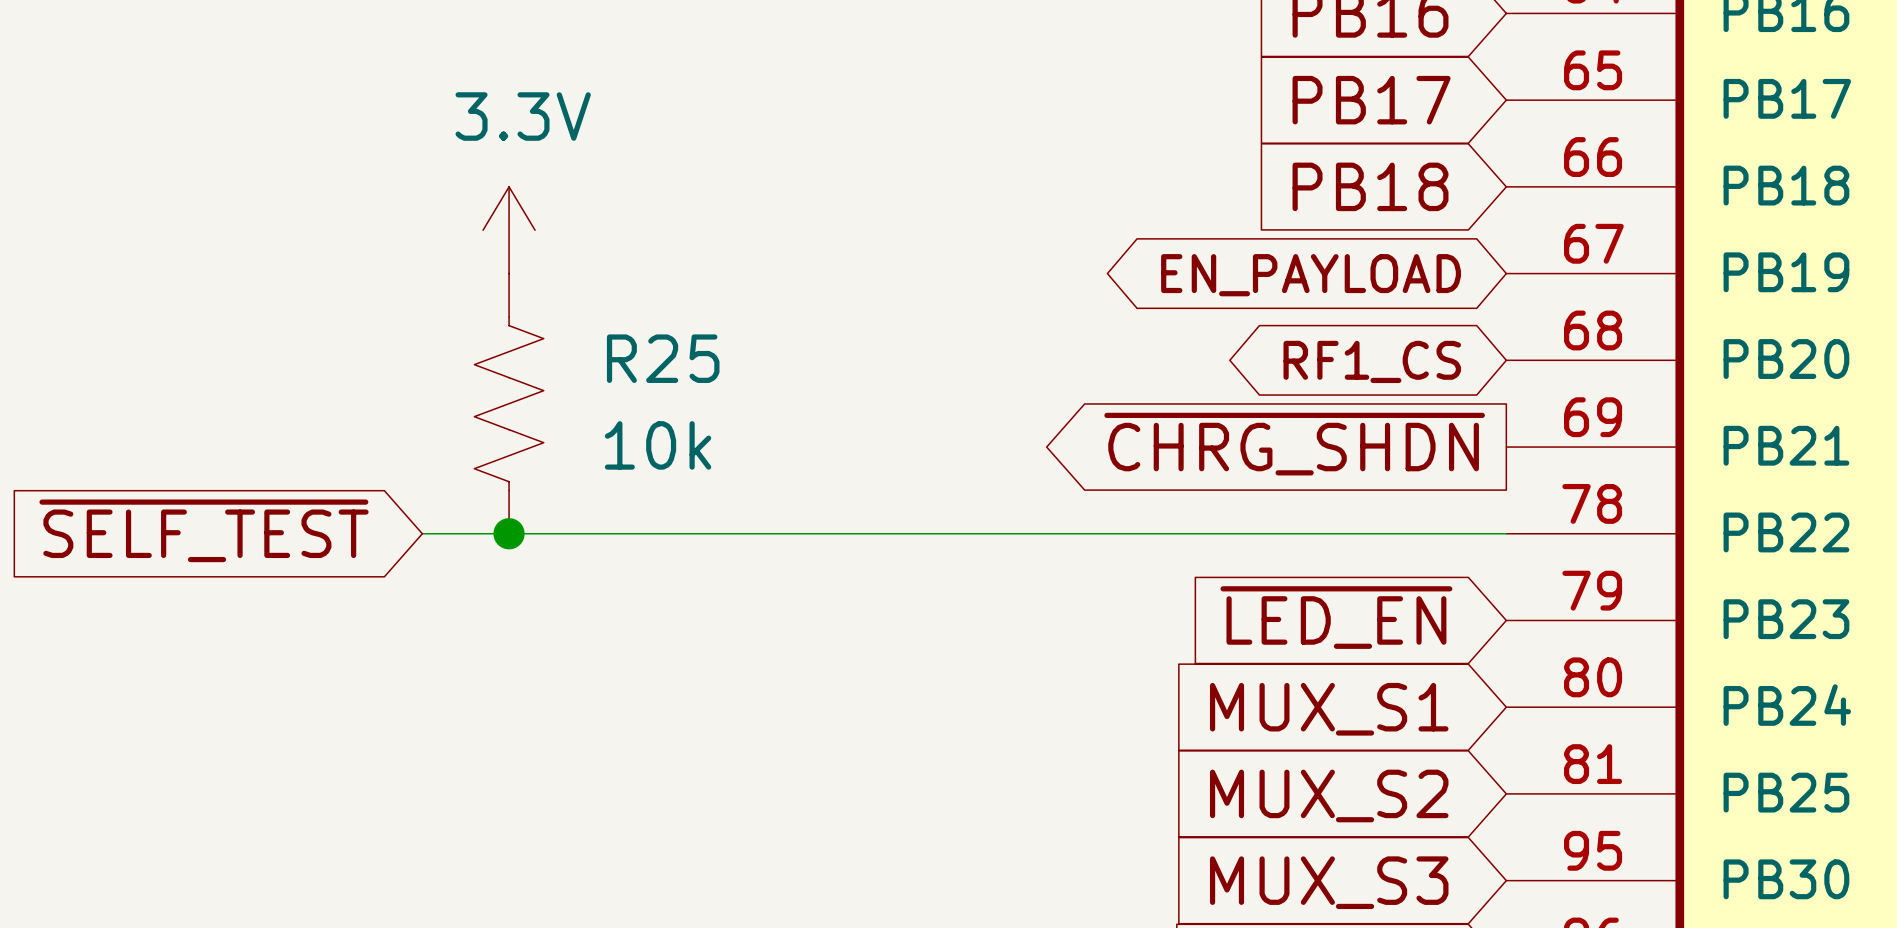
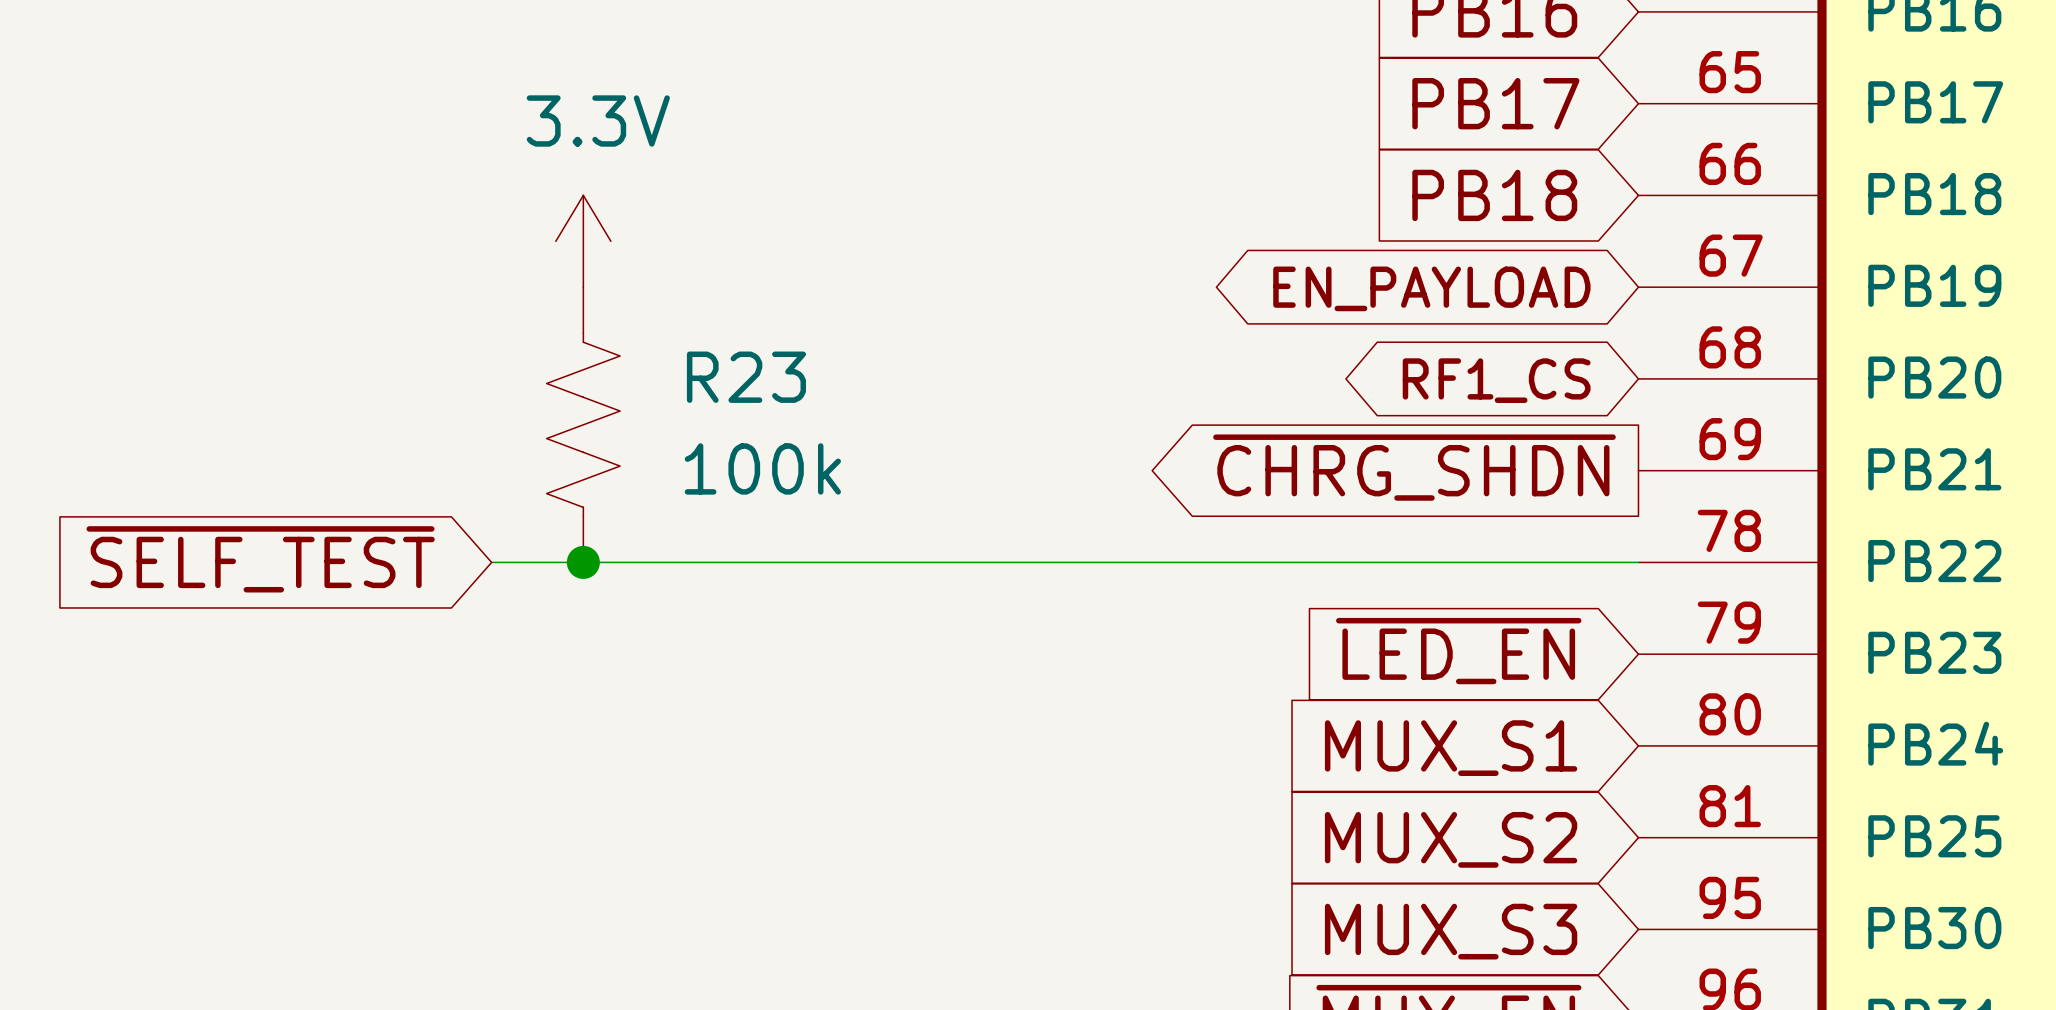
R25 name: R25 (663, 358) -> R23 (746, 377)
R25 value: 10k (658, 445) -> 100k (762, 468)

